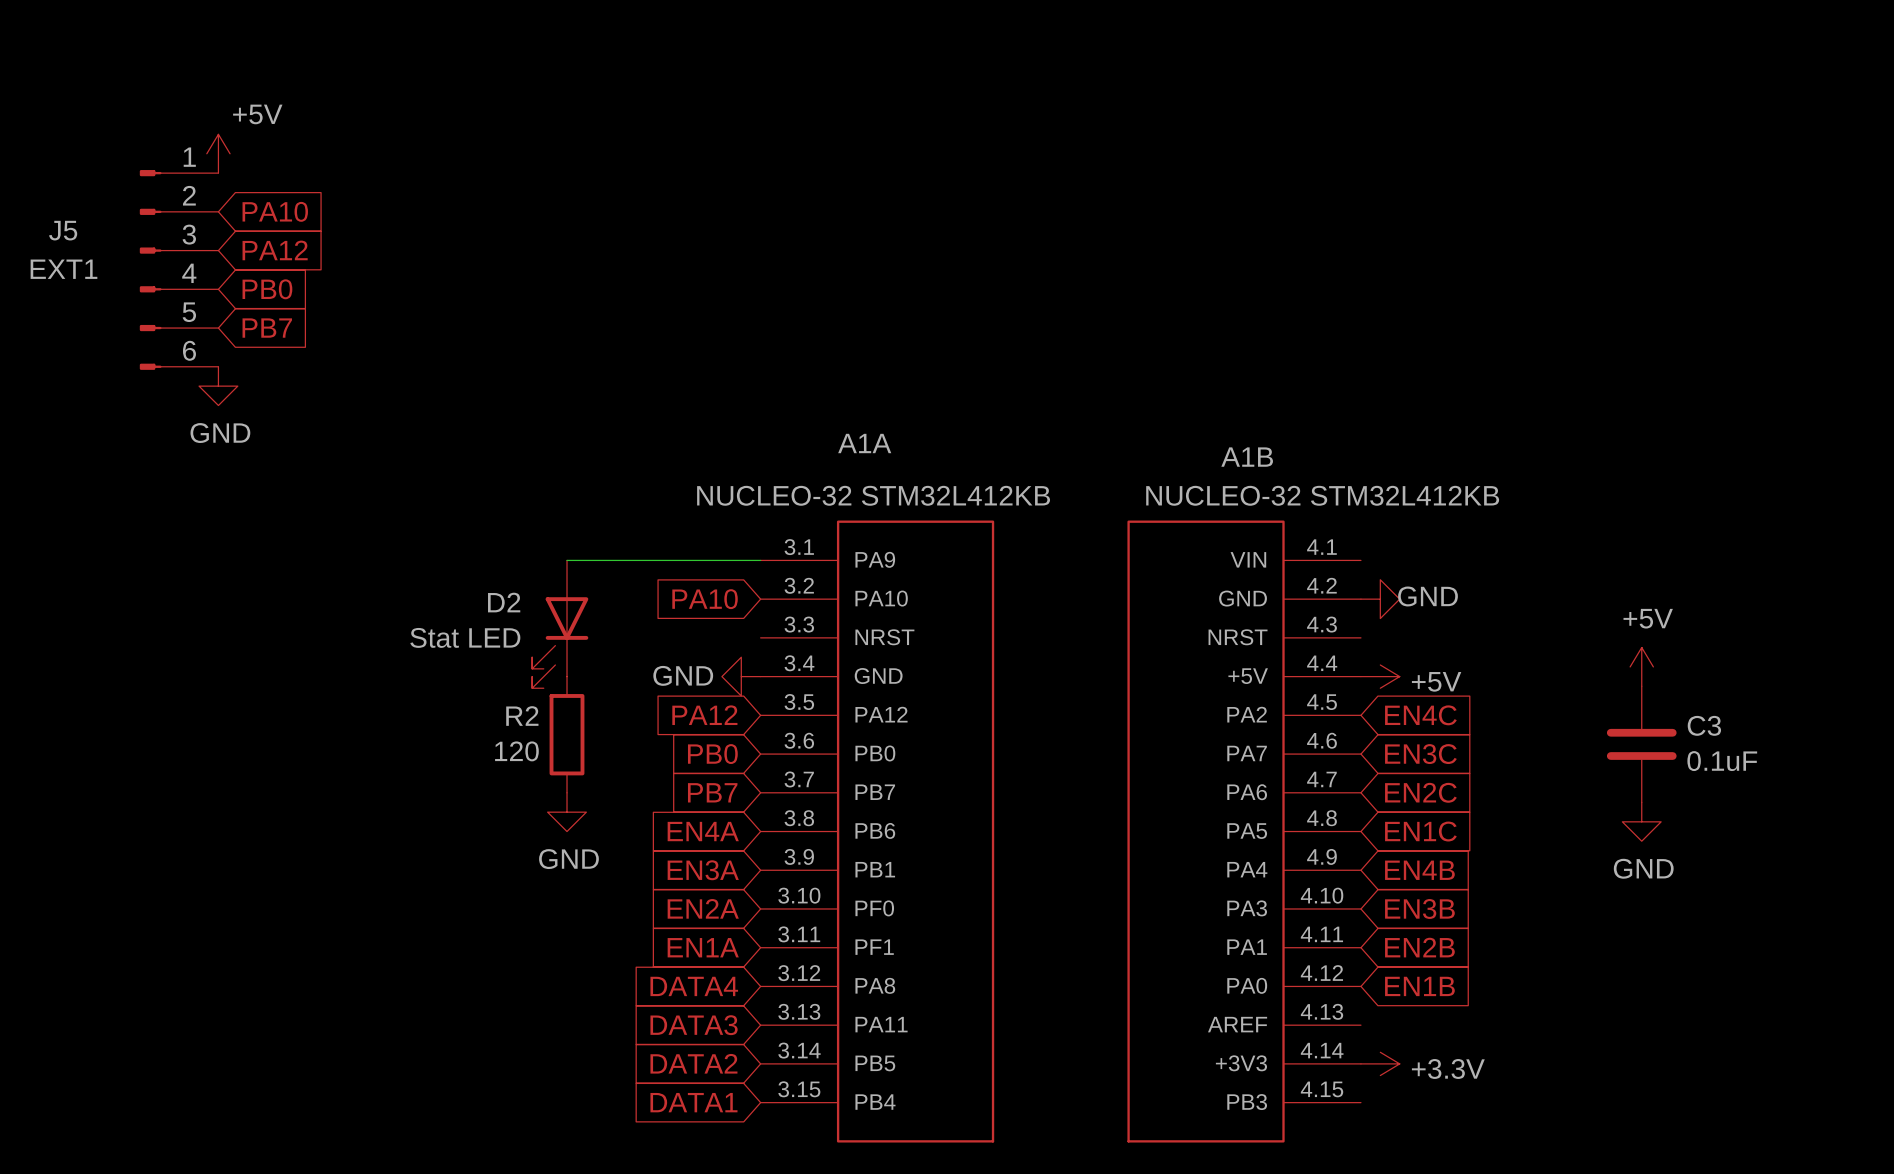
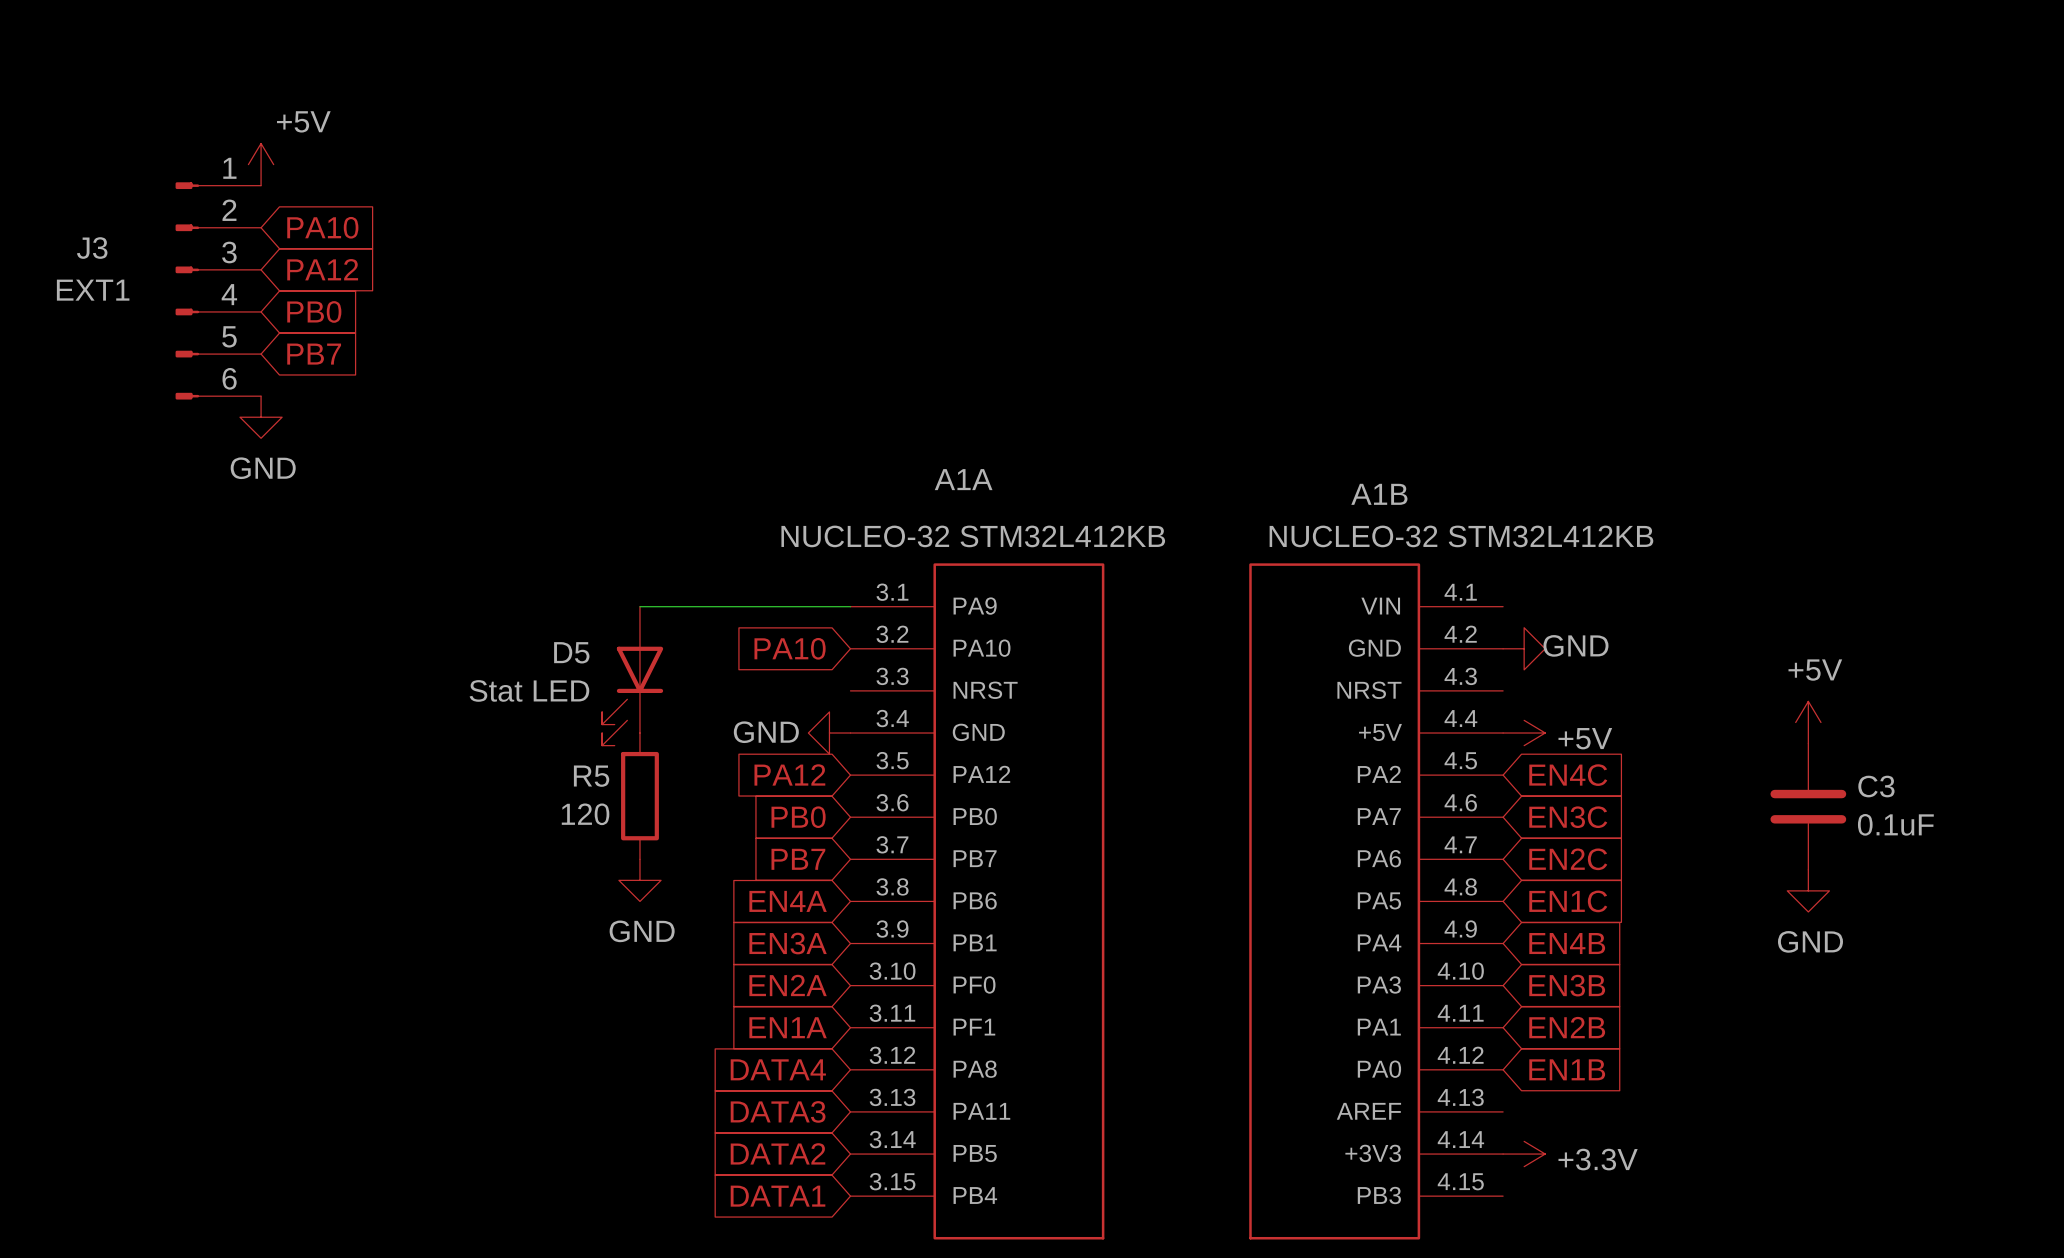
J5 name: J5 (63, 230) -> J3 (92, 248)
D2 name: D2 (504, 602) -> D5 (571, 652)
R2 name: R2 (522, 716) -> R5 (591, 776)

